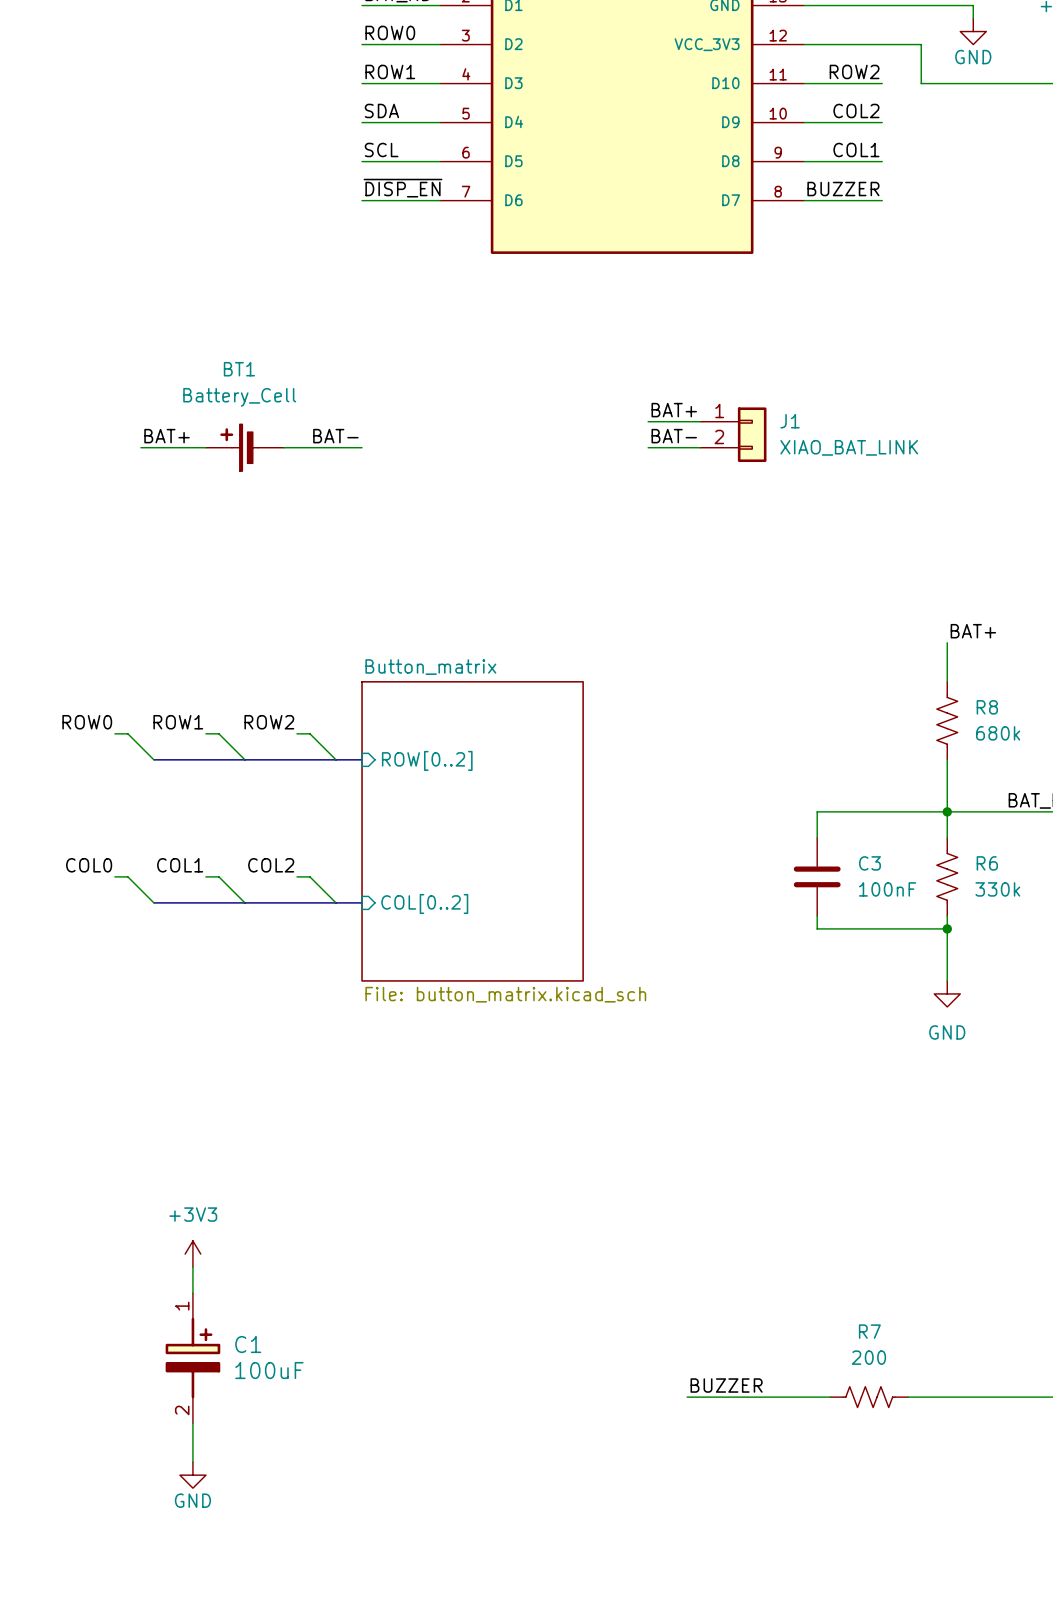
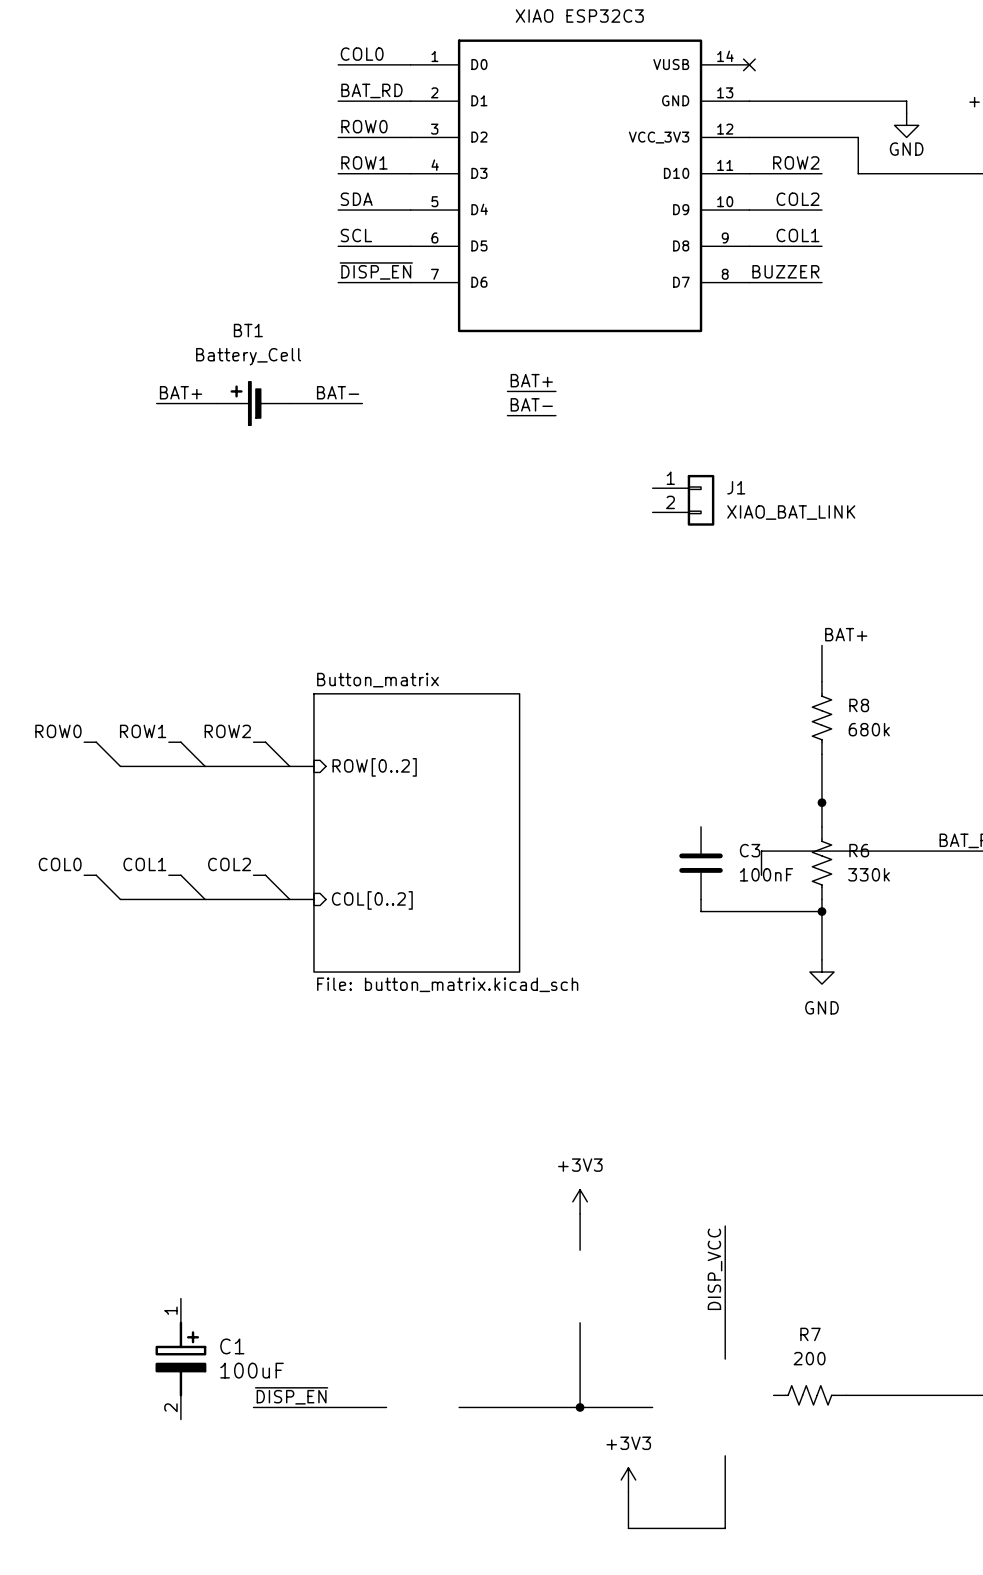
label: none -> BAT+ (531, 380)
label: none -> BAT- (338, 392)
label: none -> BAT- (531, 404)
label: BAT+ (674, 410) -> none
wire: (648, 421) (700, 421) -> (507, 391) (555, 391)
label position: BAT+ (167, 436) -> BAT+ (181, 392)
label: BAT- (335, 436) -> none
label: BAT- (674, 436) -> none
wire: (140, 447) (205, 447) -> (156, 403) (217, 403)
BT1 position: (244, 447) -> (253, 403)
wire: (283, 447) (362, 447) -> (289, 403) (362, 403)
wire: (648, 447) (700, 447) -> (507, 415) (555, 415)
label position: BAT+ (973, 631) -> BAT+ (846, 634)
wire: (947, 642) (947, 681) -> (821, 645) (821, 681)
R8 position: (947, 720) -> (821, 718)
label position: ROW0 (87, 722) -> ROW0 (58, 731)
label position: ROW1 (178, 722) -> ROW1 (143, 731)
label position: ROW2 (269, 722) -> ROW2 (227, 731)
wire: (114, 733) (127, 733) (153, 759) -> (84, 742) (96, 742) (120, 766)
wire: (205, 733) (218, 733) (244, 759) -> (168, 742) (180, 742) (205, 766)
wire: (296, 733) (310, 733) (336, 759) -> (253, 742) (265, 742) (289, 766)
bus: (153, 759) (362, 759) -> (120, 766) (313, 766)
junction: none -> (821, 802)
wire: (947, 759) (947, 837) -> (821, 754) (821, 826)
sheet pin position: ROW[0..2] (427, 760) -> ROW[0..2] (374, 767)
junction: (947, 811) -> none
sheet Button_matrix position: (472, 831) -> (416, 832)
label position: COL0 (89, 865) -> COL0 (60, 864)
label position: COL1 (180, 865) -> COL1 (144, 864)
label position: COL2 (271, 865) -> COL2 (229, 864)
wire: (114, 876) (127, 876) (153, 902) -> (84, 875) (96, 875) (120, 899)
wire: (205, 876) (218, 876) (244, 902) -> (168, 875) (180, 875) (205, 899)
wire: (296, 876) (310, 876) (336, 902) -> (253, 875) (265, 875) (289, 899)
C3 position: (817, 876) -> (701, 863)
junction: none -> (821, 911)
R6 position: (947, 876) -> (821, 863)
bus: (153, 902) (362, 902) -> (120, 899) (313, 899)
sheet pin position: COL[0..2] (424, 903) -> COL[0..2] (372, 900)
wire: (817, 915) (817, 928) (947, 928) -> (701, 899) (701, 911) (821, 911)
wire: (947, 915) (947, 980) -> (821, 899) (821, 959)
junction: (947, 928) -> none
power symbol position: GND (947, 993) -> GND (821, 972)
power symbol: none -> +3V3 (580, 1201)
wire: none -> (580, 1213) (580, 1250)
wire: none -> (725, 1226) (725, 1359)
power symbol: +3V3 (192, 1254) -> none
label: none -> DISP_VCC (715, 1269)
wire: (192, 1267) (192, 1293) -> none
wire: none -> (580, 1322) (580, 1407)
label: BUZZER (726, 1385) -> none
label: none -> ~{DISP_EN} (291, 1395)
wire: (687, 1397) (830, 1397) -> none
wire: none -> (253, 1407) (386, 1407)
wire: none -> (459, 1407) (652, 1407)
junction: none -> (580, 1407)
wire: (192, 1423) (192, 1462) -> none
wire: none -> (725, 1455) (725, 1528) (628, 1528) (628, 1492)
power symbol: GND (192, 1475) -> none
power symbol: none -> +3V3 (628, 1480)

